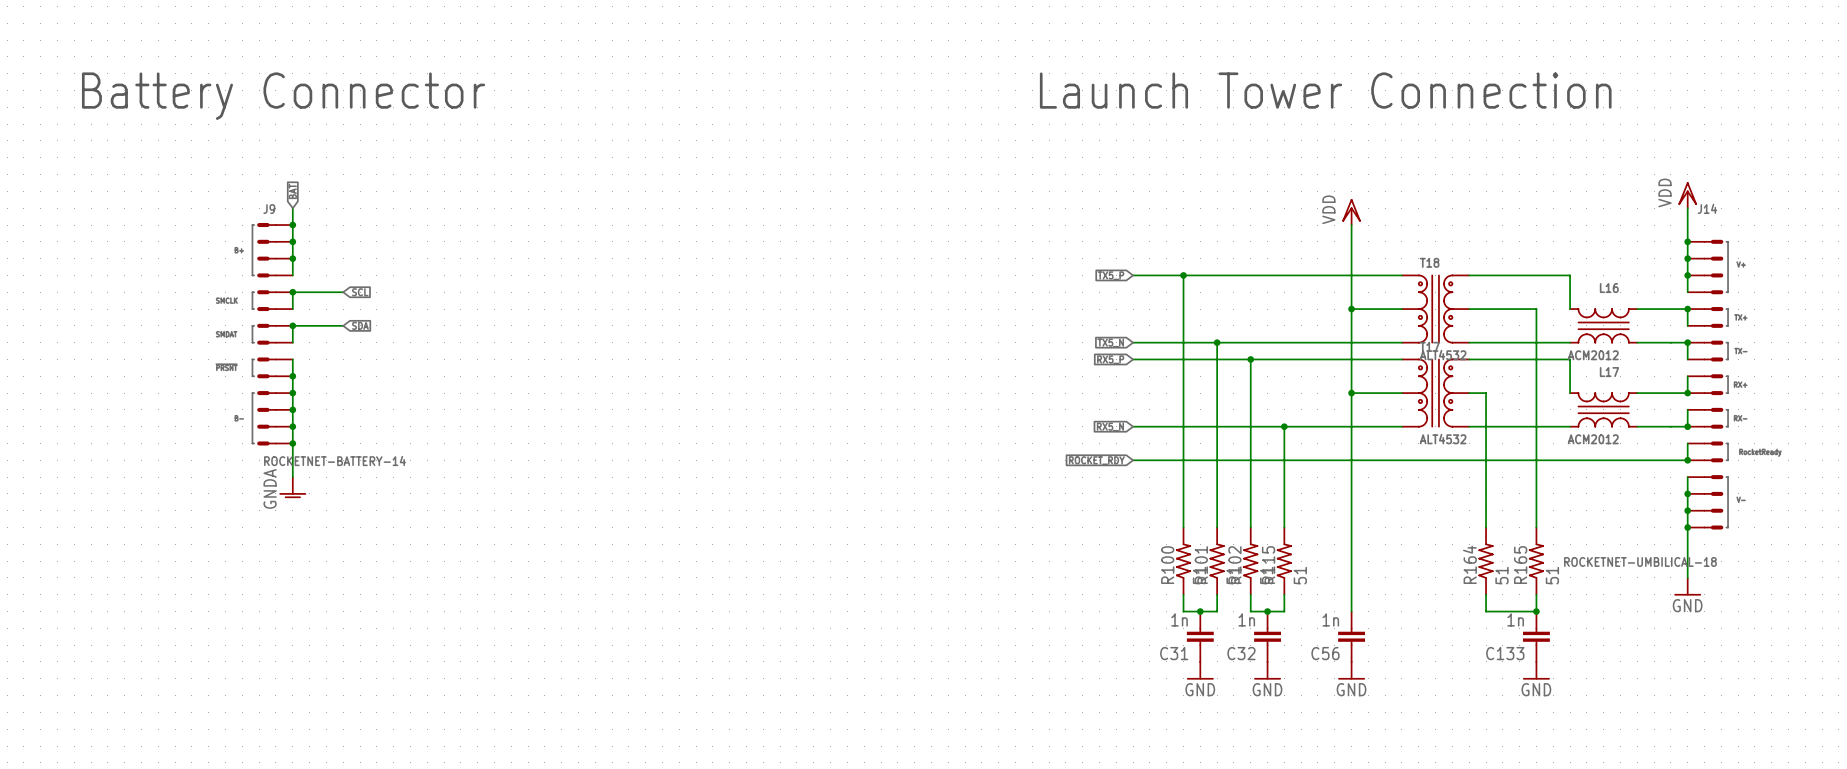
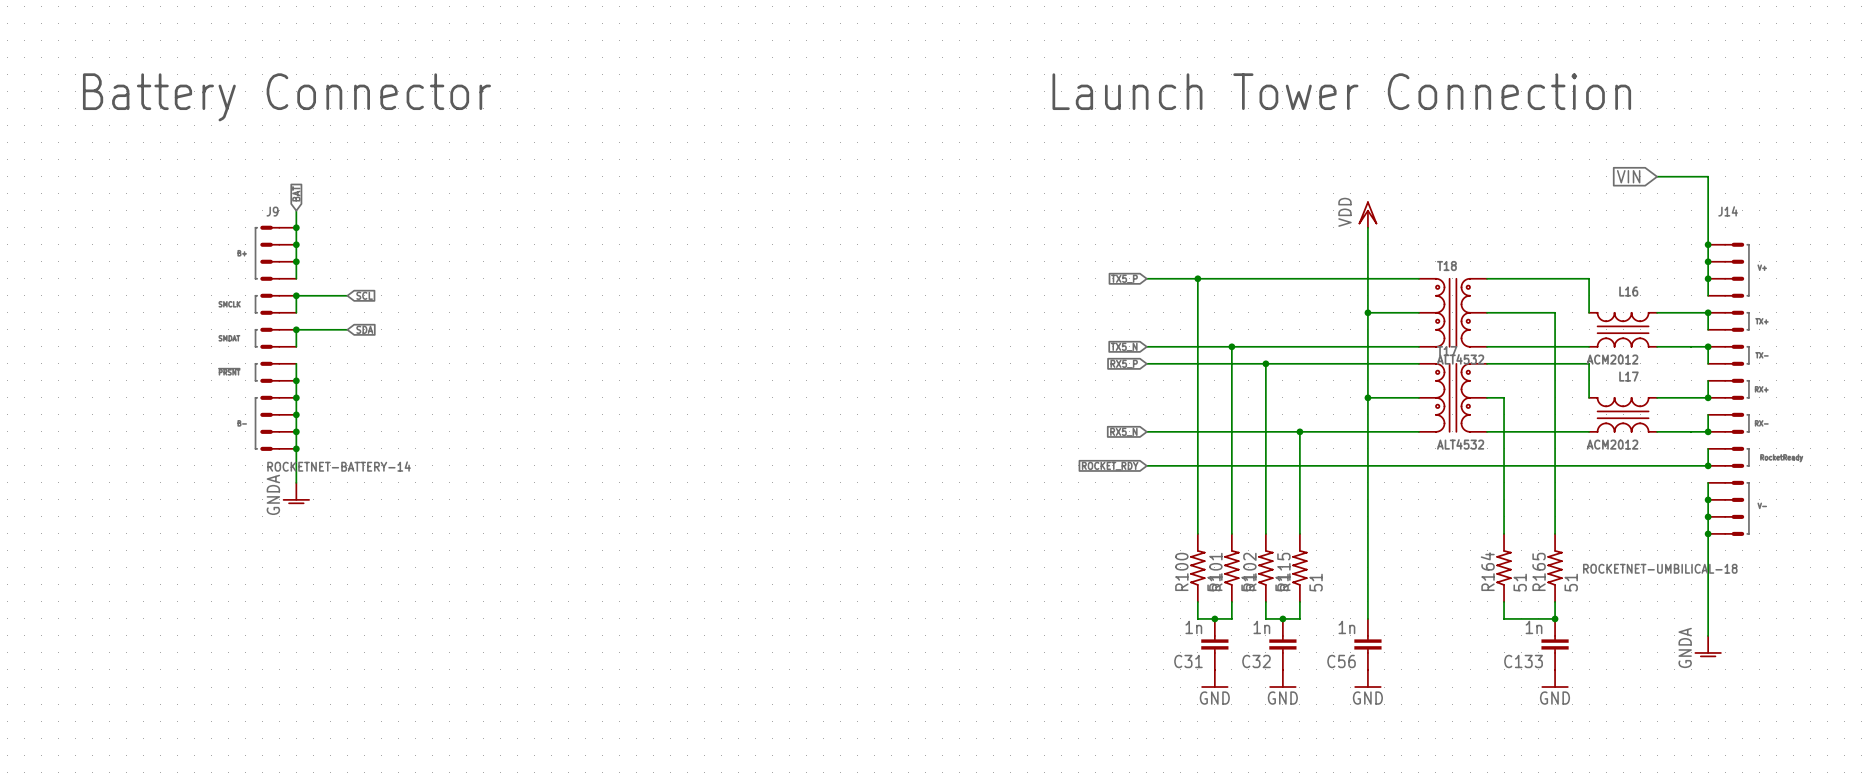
global label: none -> VIN (1628, 176)
wire: none -> (1657, 176) (1708, 176) (1708, 210)
power symbol: VDD (1687, 195) -> none
wire: none -> (1708, 584) (1708, 635)
power symbol: GND (1687, 586) -> none
power symbol: none -> GNDA (1708, 646)

